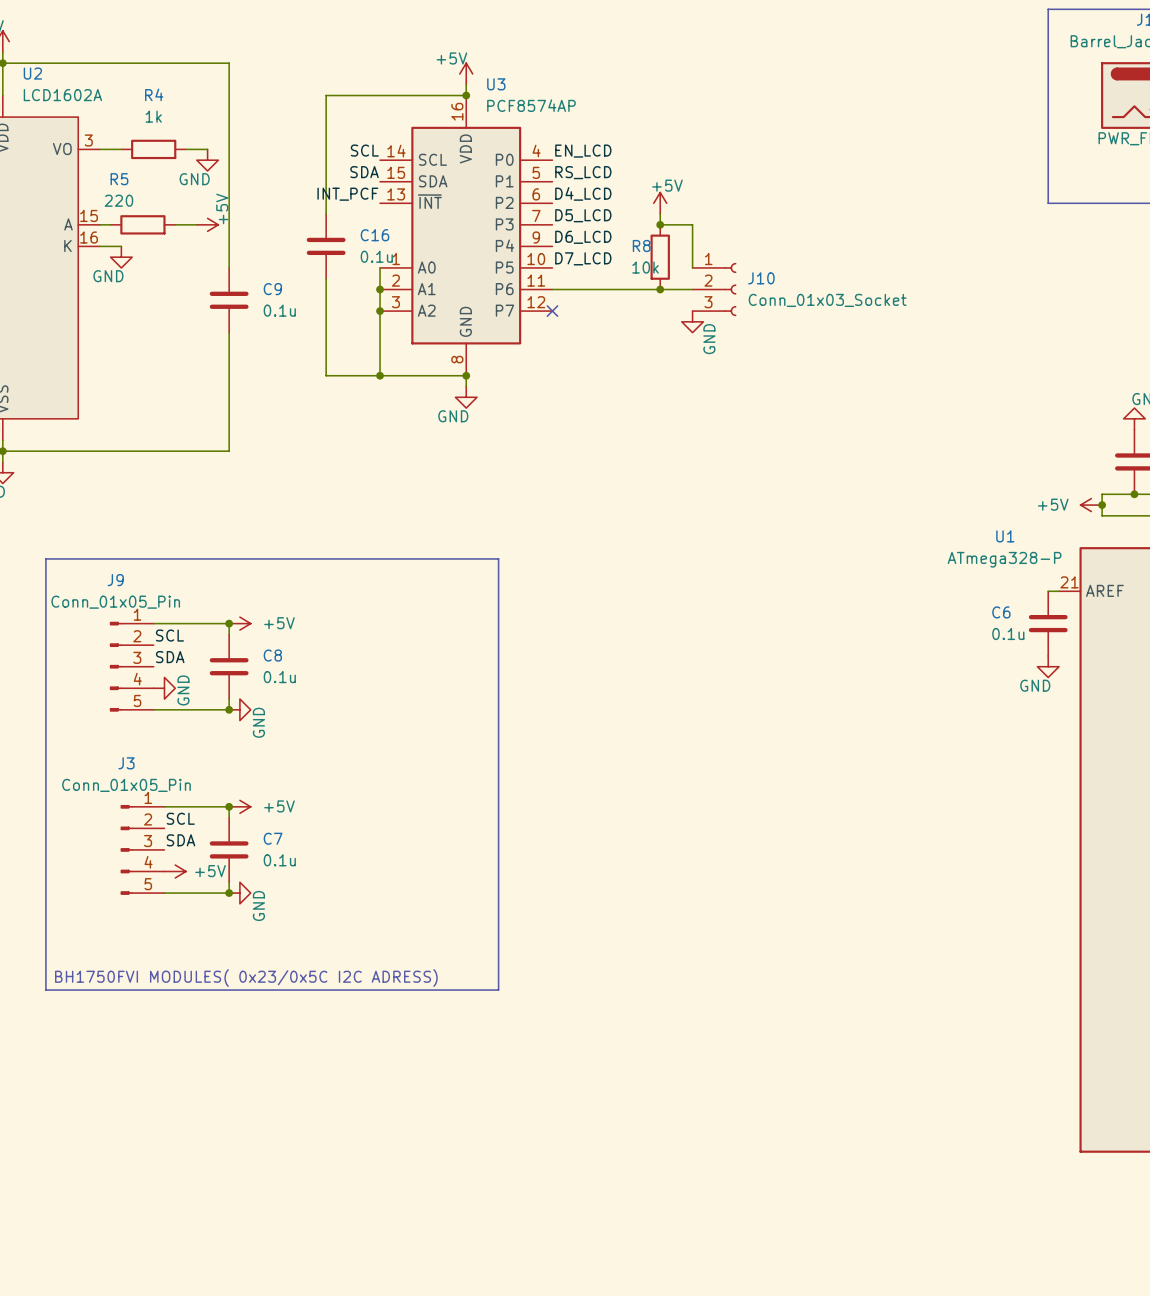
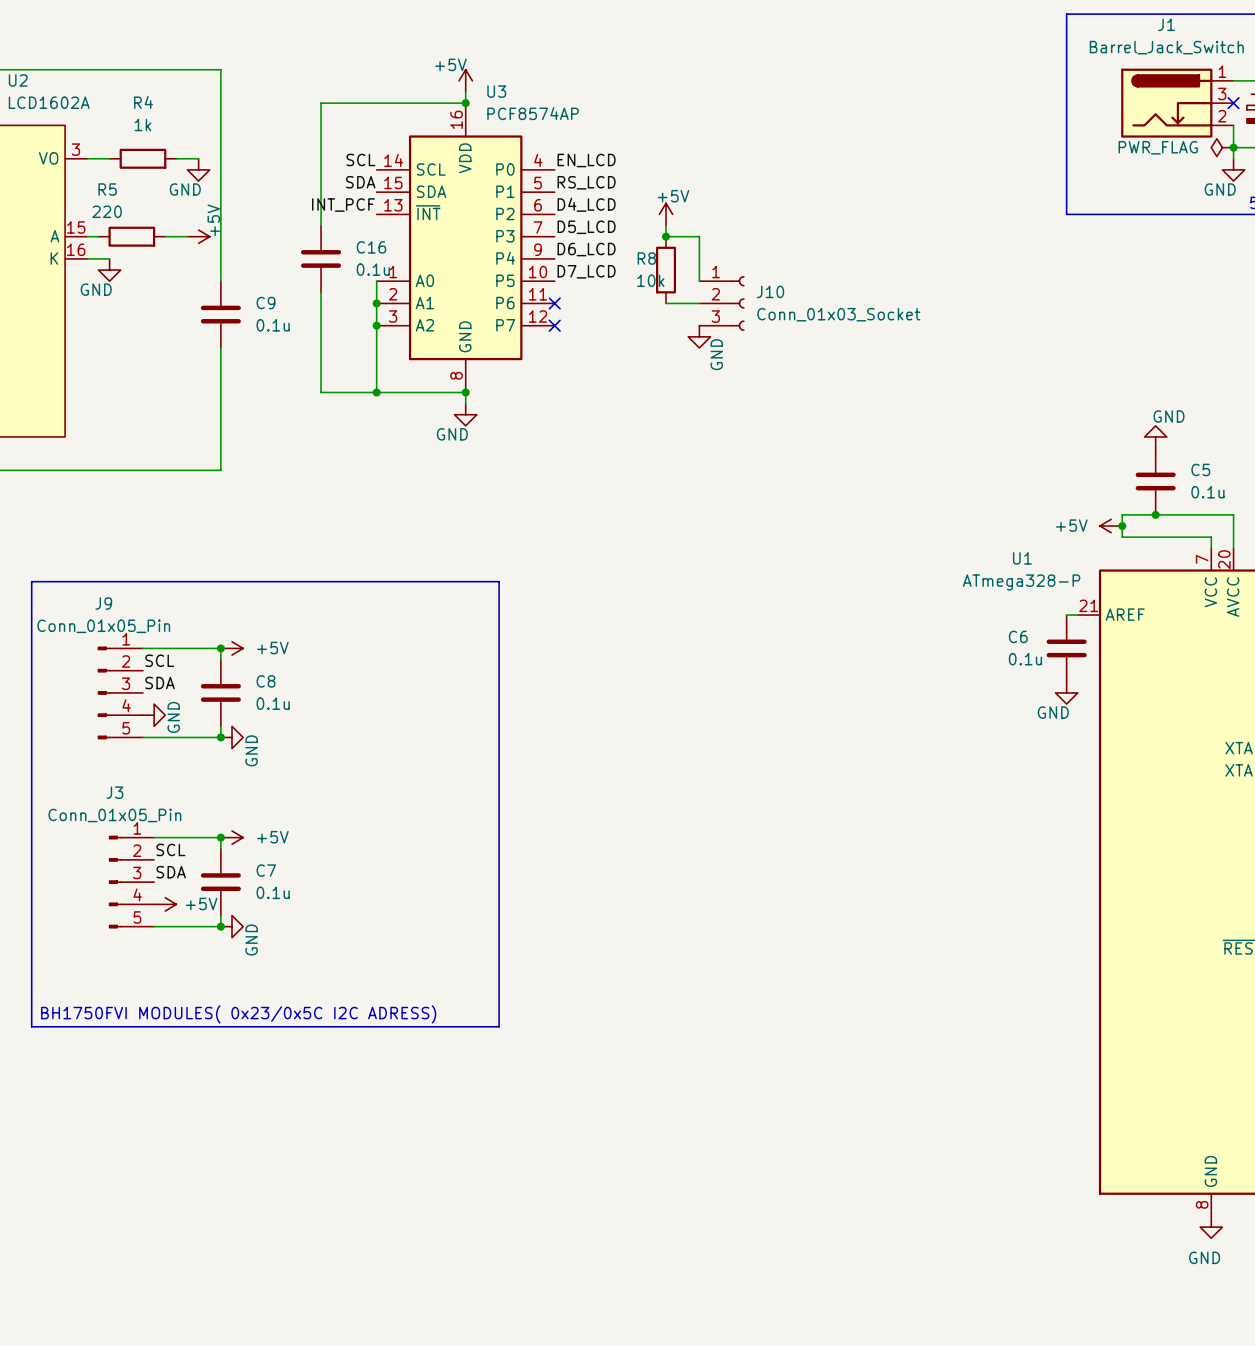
wire: (552, 289) (660, 289) -> none
no-connect mark: none -> (554, 303)
junction: (660, 289) -> none

